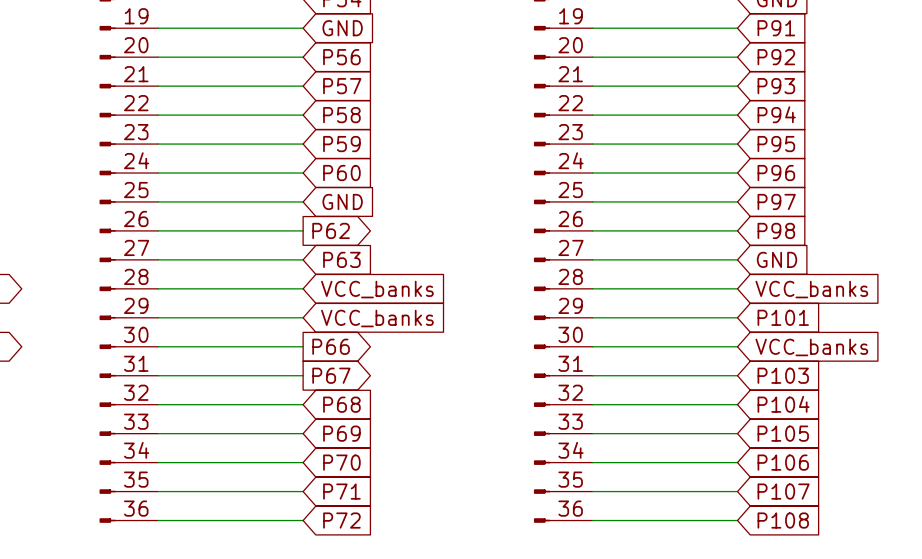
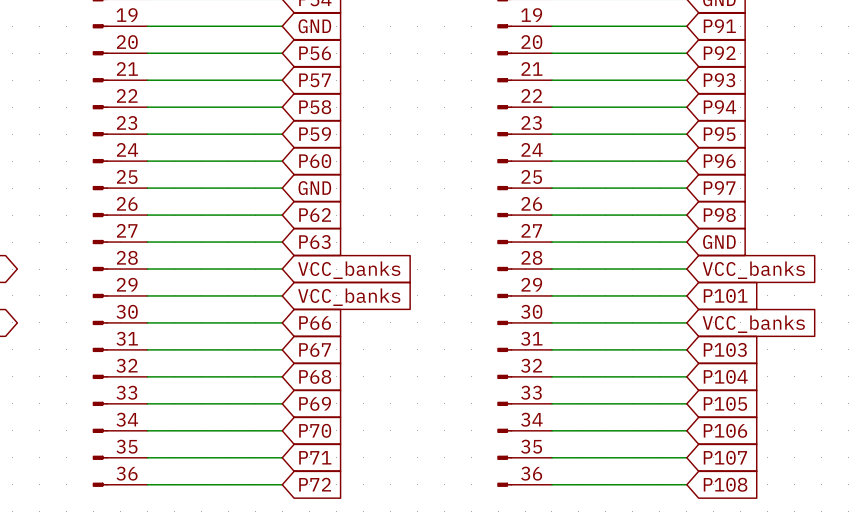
global label shape: output (331, 230) -> input (315, 215)
global label shape: output (331, 346) -> input (315, 323)
global label shape: output (331, 375) -> input (315, 350)

